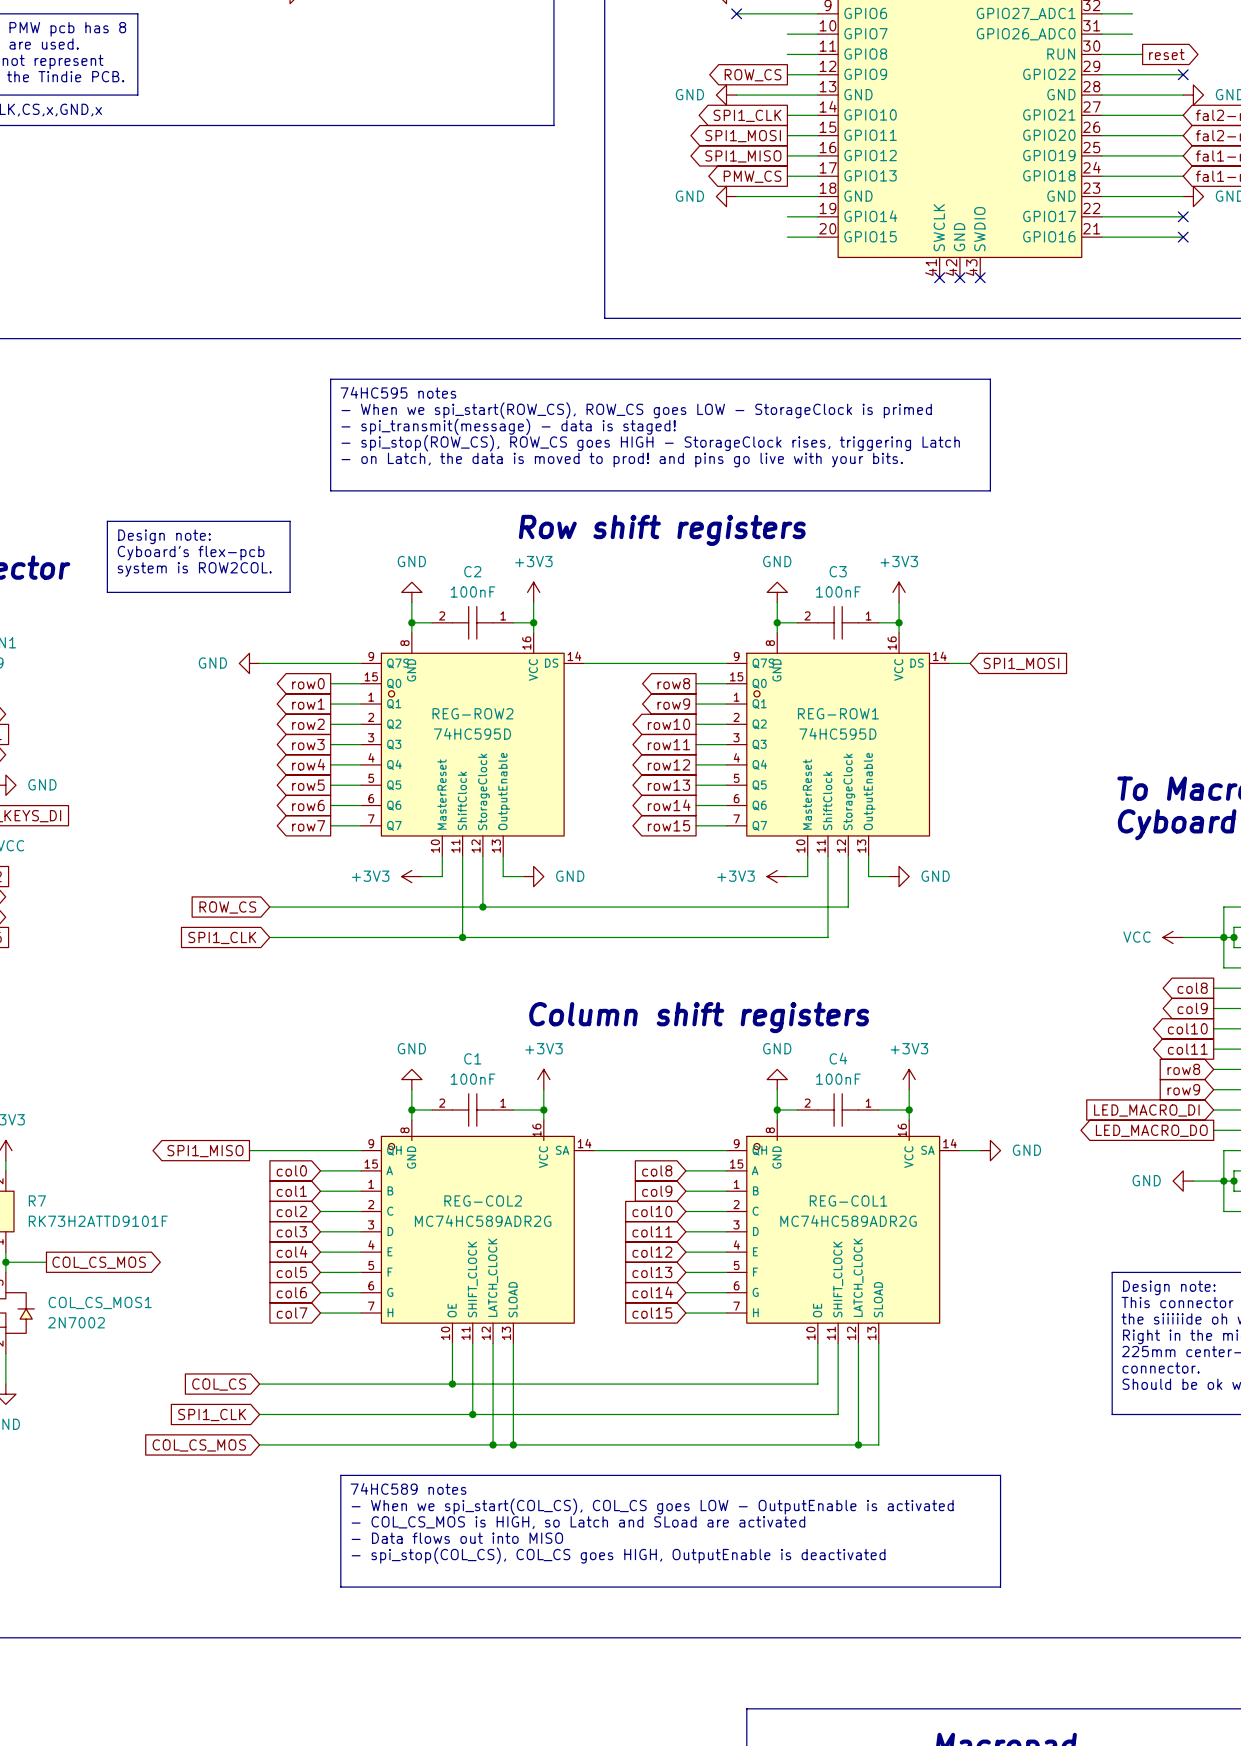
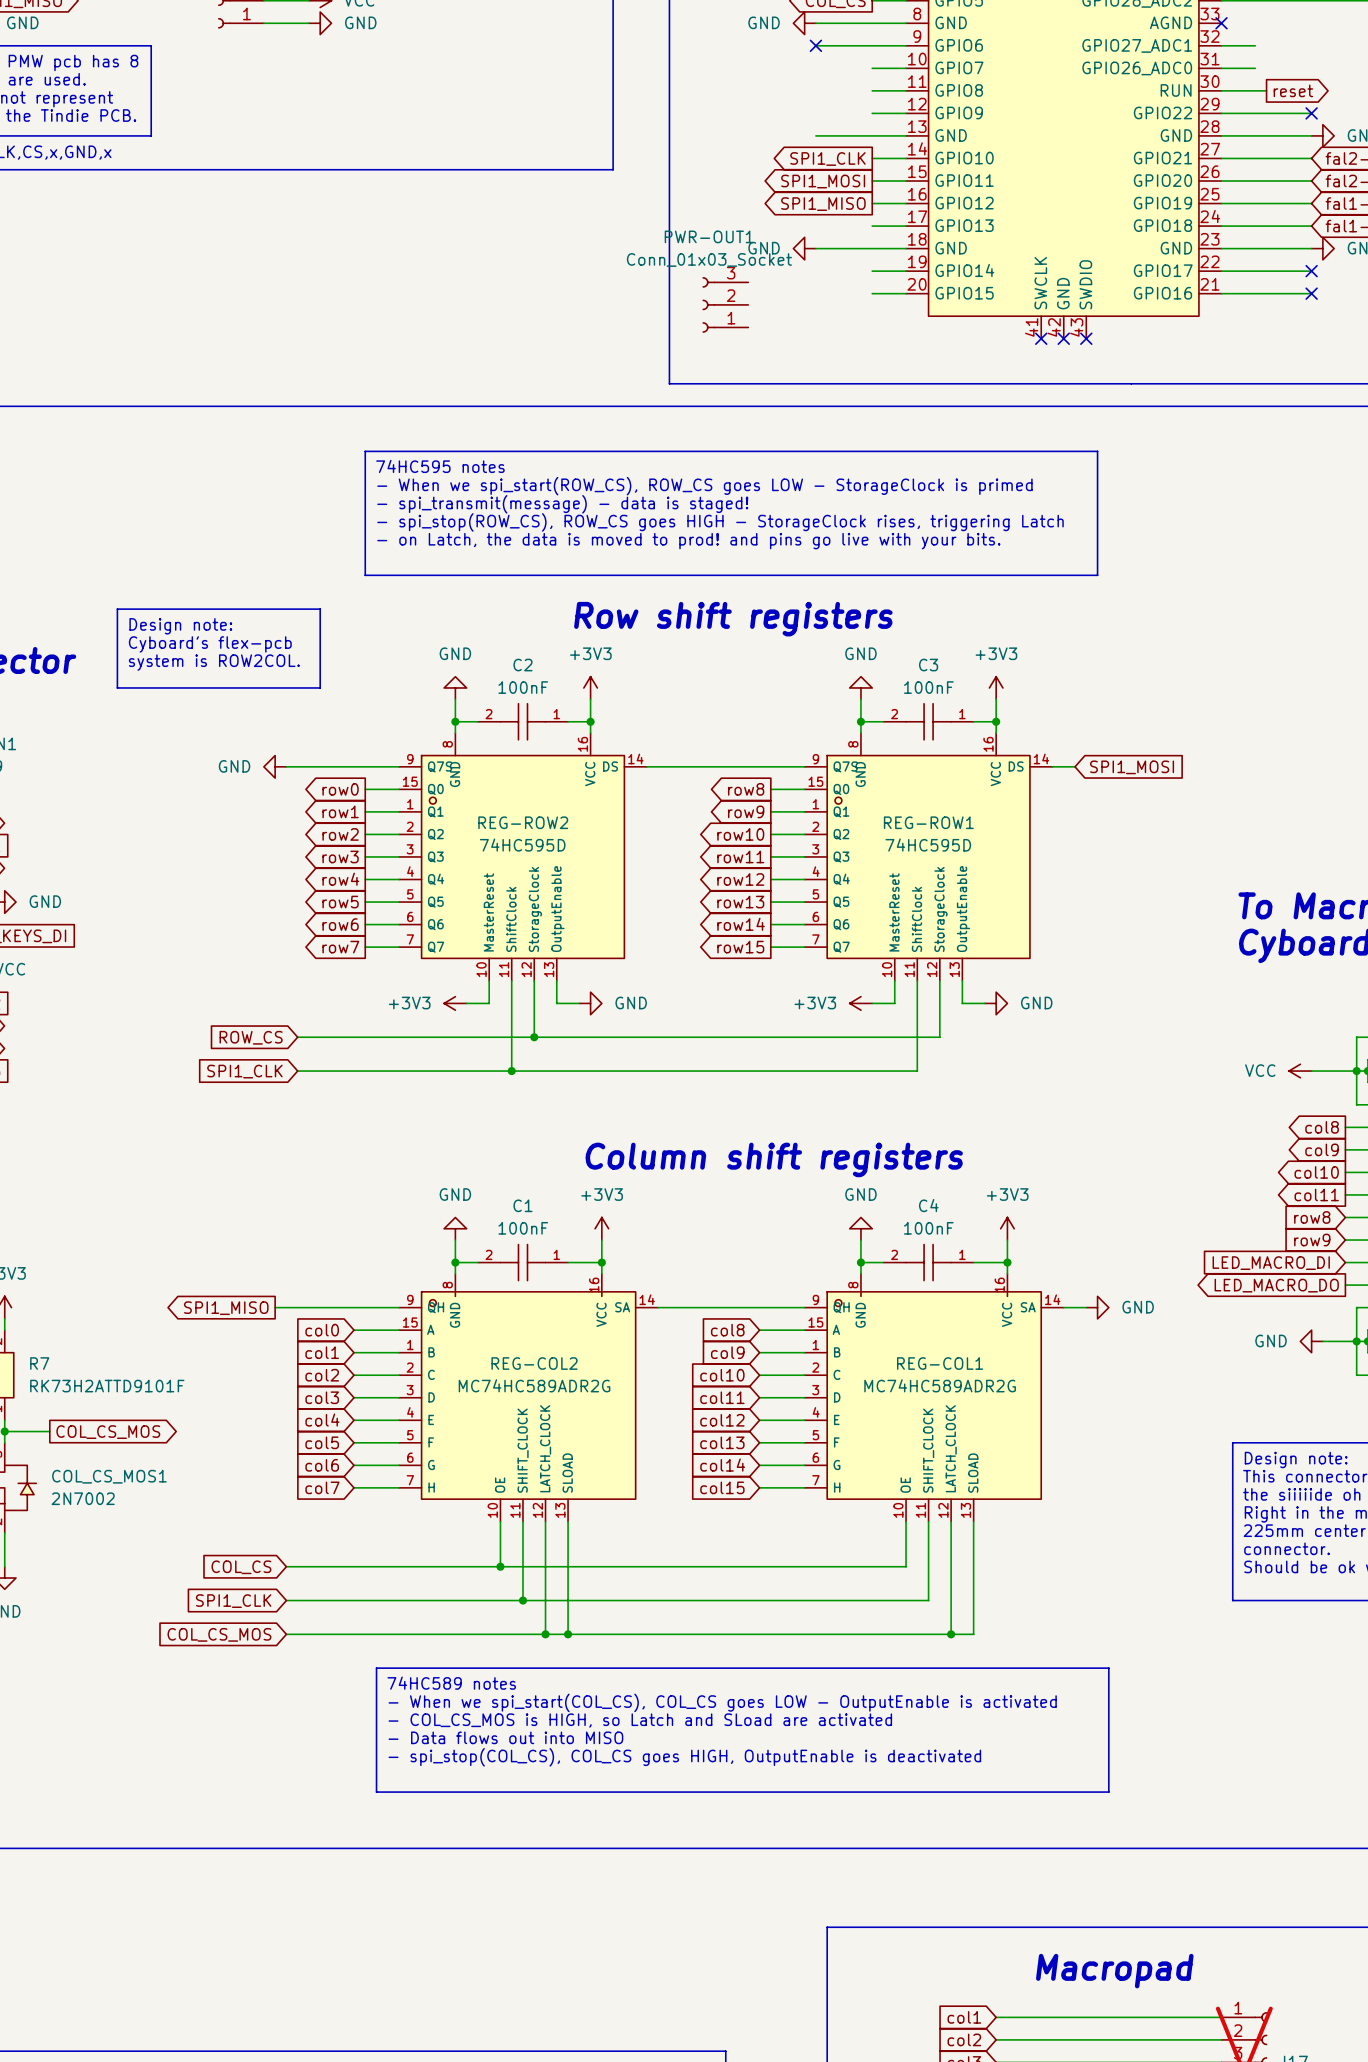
global label: ROW_CS (753, 75) -> none
power symbol: GND (726, 95) -> none
global label: PMW_CS (752, 176) -> none
PWR-OUT1: none -> Conn_01x03_Socket (725, 304)

